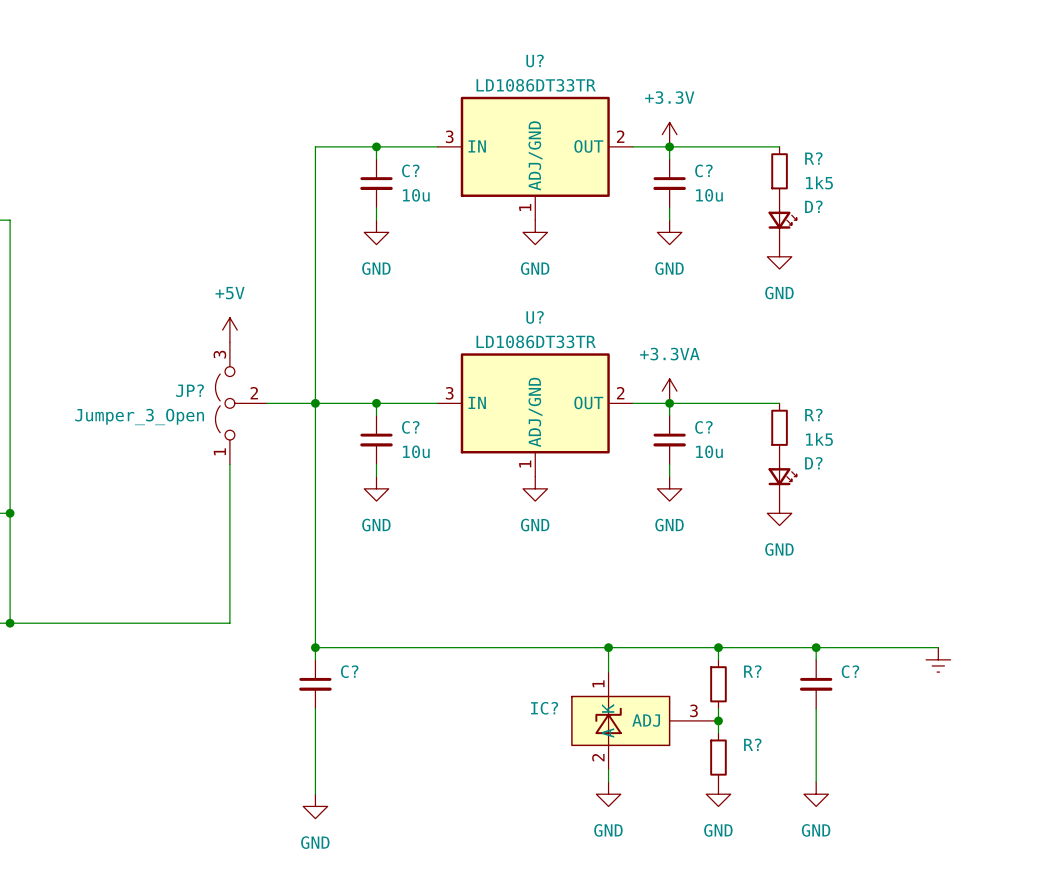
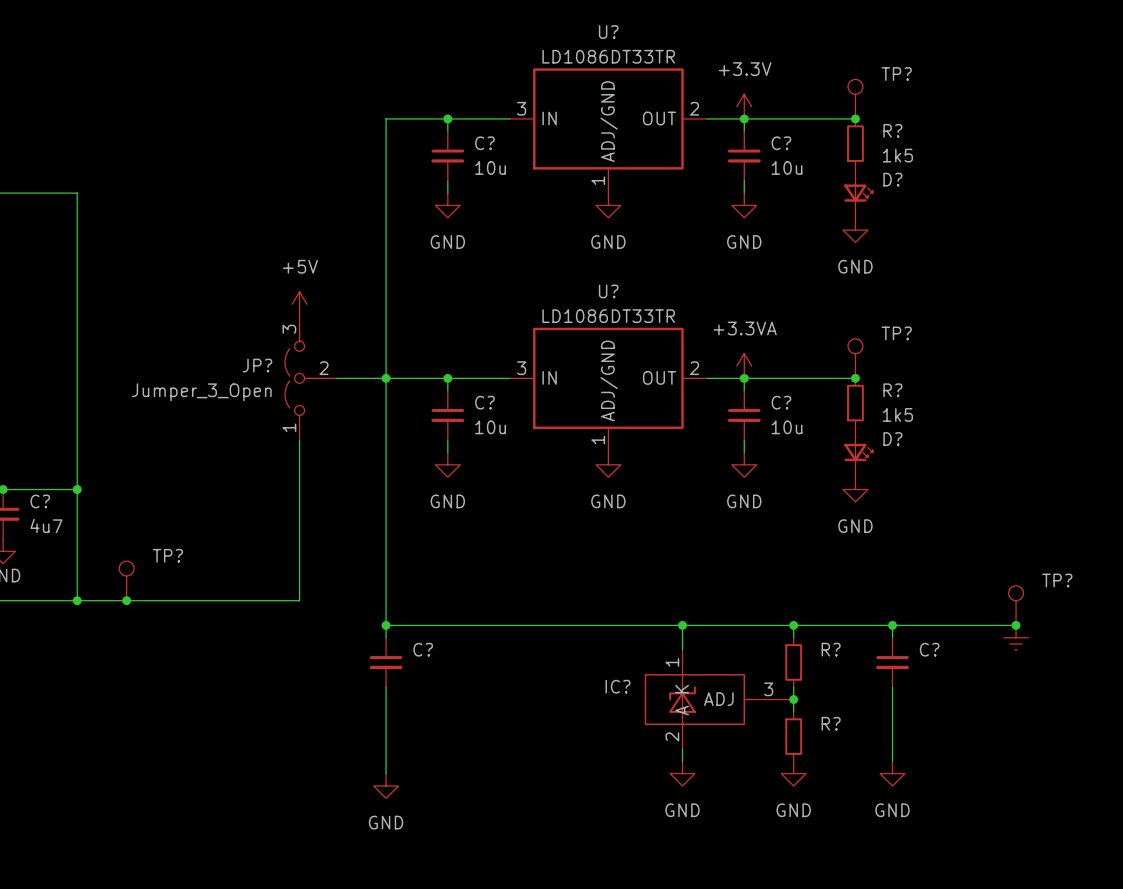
TP?: none -> (855, 99)
junction: none -> (855, 118)
TP?: none -> (855, 358)
junction: none -> (855, 378)
TP?: none -> (126, 580)
junction: none -> (126, 600)
TP?: none -> (1016, 605)
junction: none -> (1016, 625)

